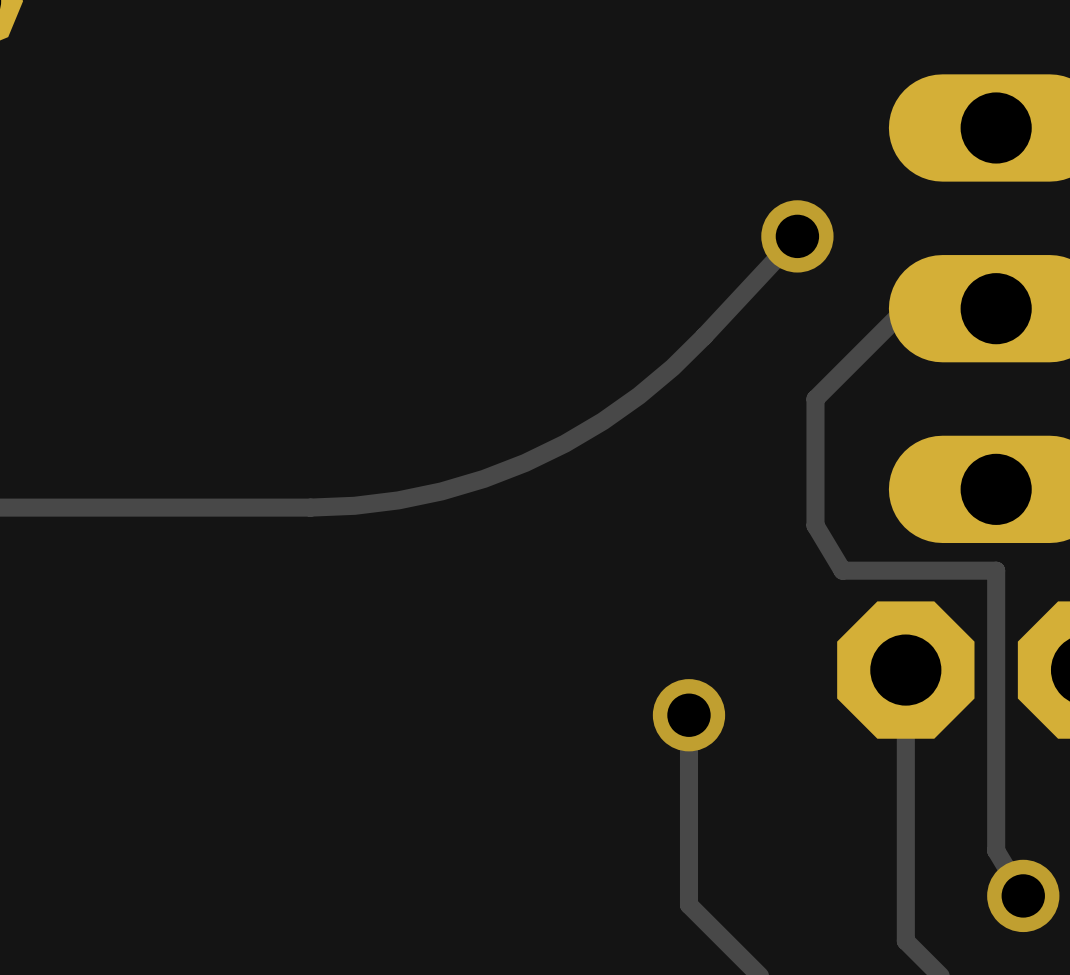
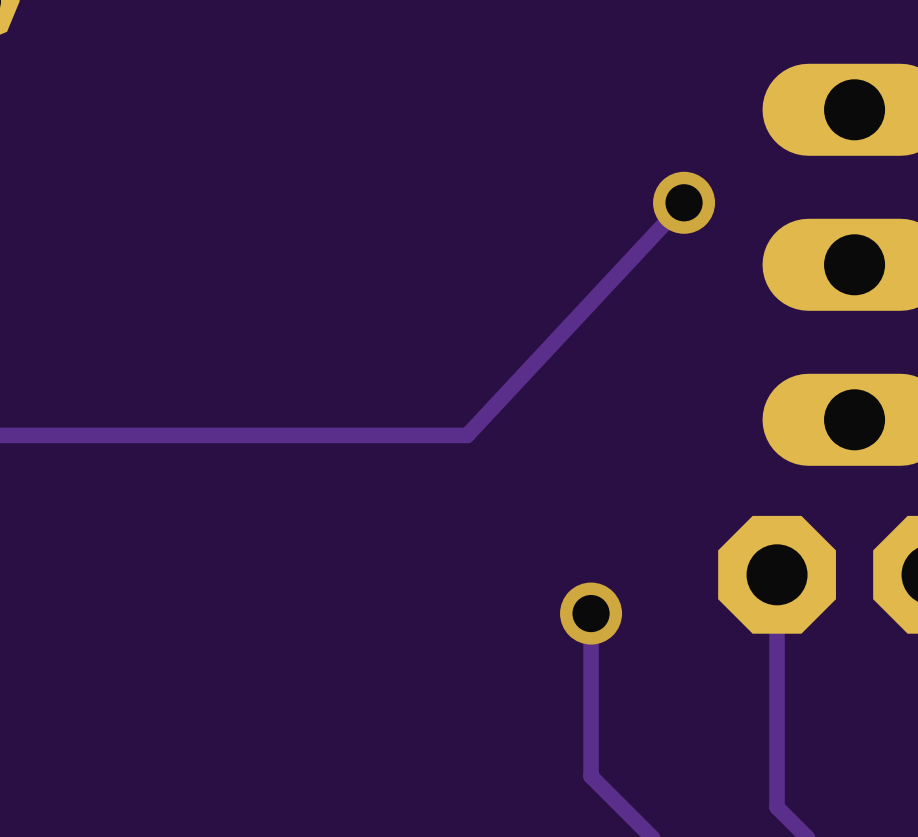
track: (996, 308) (905, 308) (815, 399) (815, 525) (842, 570) (996, 570) (996, 850) (1023, 895) -> none
track: (704, 336) (672, 367) (638, 395) (602, 421) (564, 443) (525, 462) (484, 478) (441, 491) (398, 500) (354, 505) (310, 507) -> (604, 288) (467, 435) (266, 435)
via: (1023, 895) -> none

